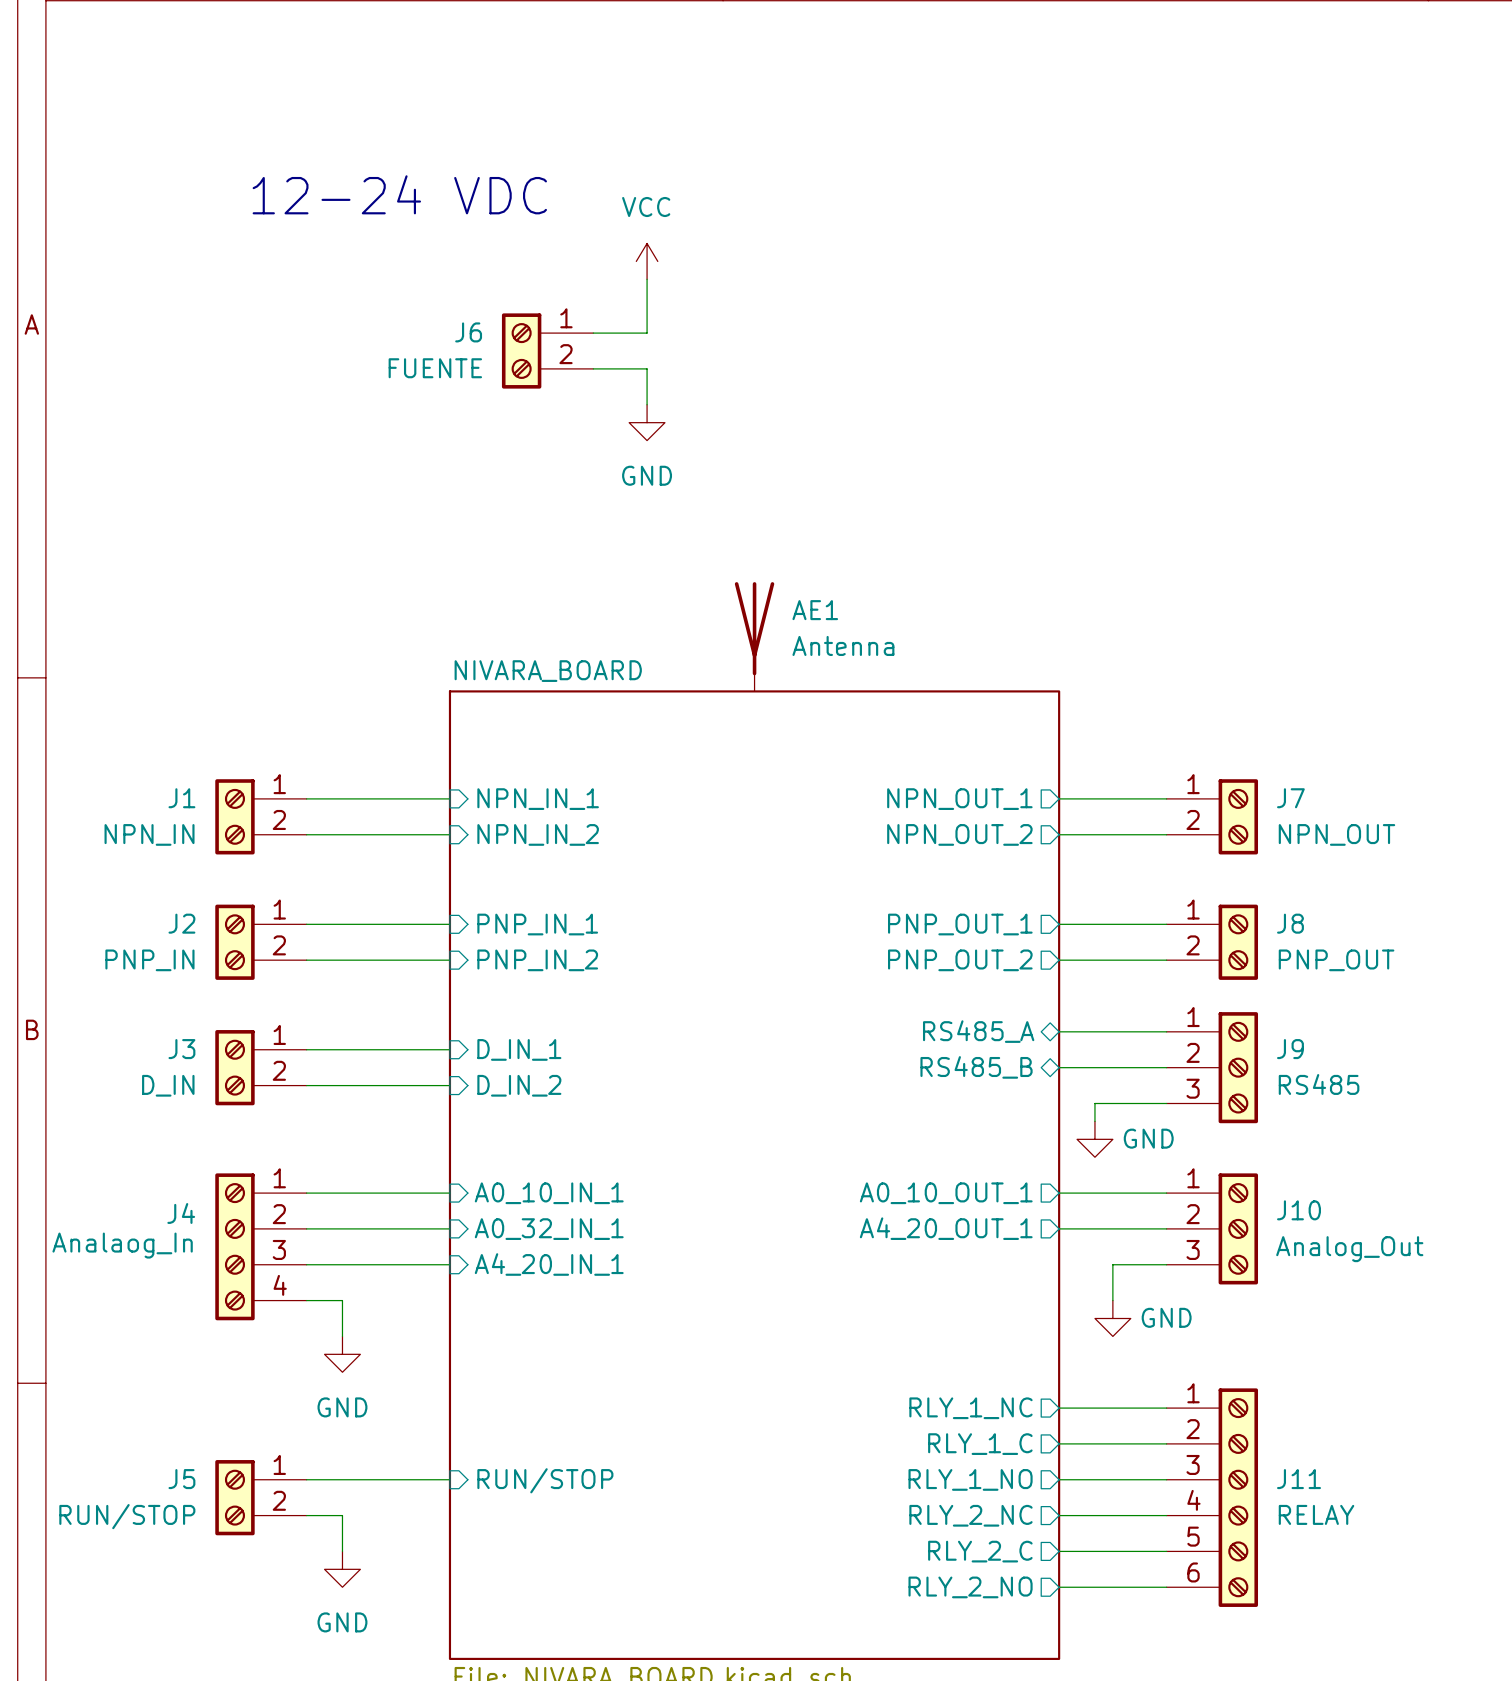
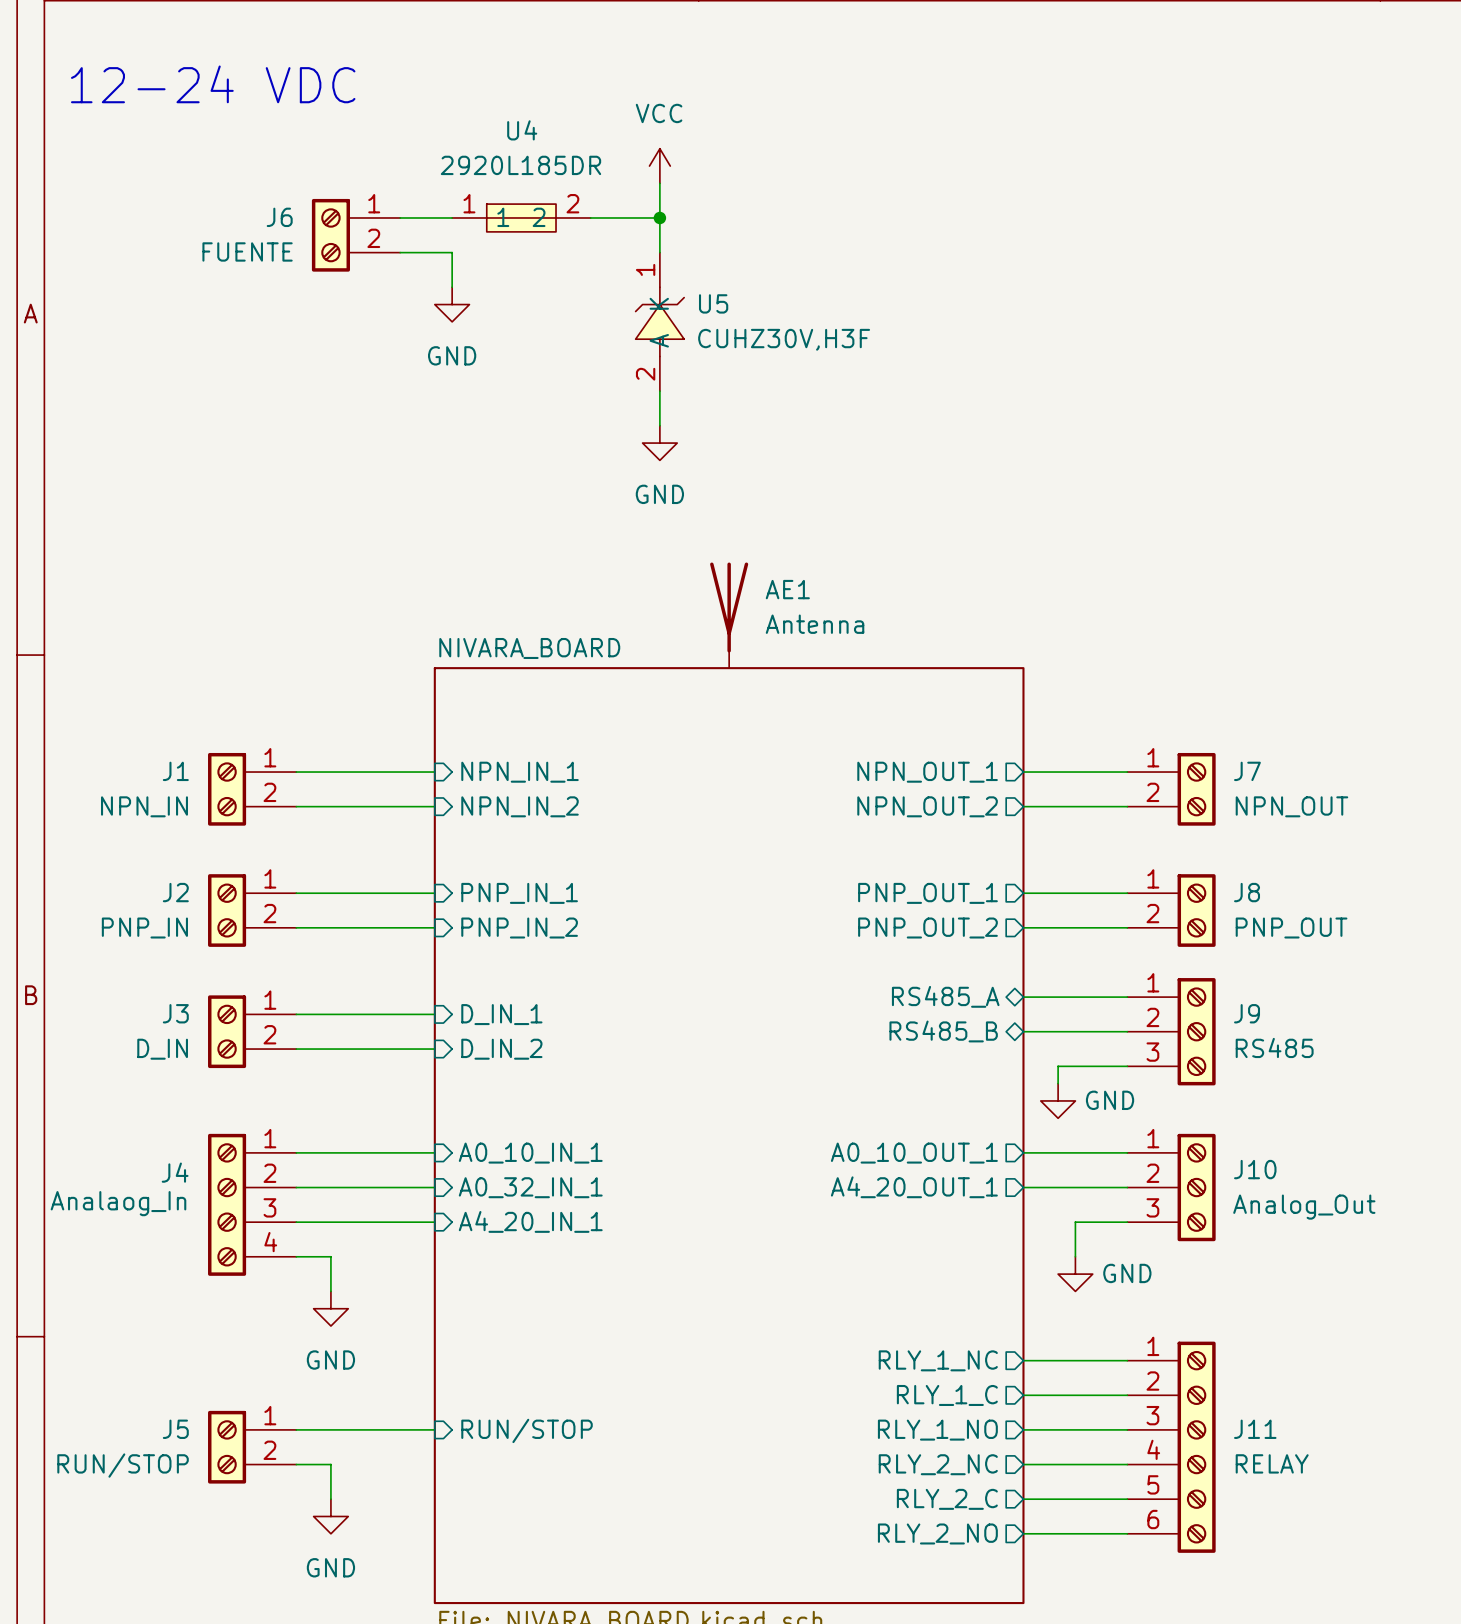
wire: none -> (659, 183) (659, 252)
text position: 12-24 VDC (399, 194) -> 12-24 VDC (213, 84)
wire: none -> (400, 217) (452, 217)
U4: none -> 2920L185DR (521, 217)
wire: none -> (590, 217) (659, 217)
junction: none -> (659, 217)
power symbol position: VCC (647, 261) -> VCC (659, 166)
wire: (647, 279) (647, 333) (593, 333) -> none
power symbol: none -> GND (452, 304)
U5: none -> CUHZ30V,H3F (659, 321)
J6 position: (547, 351) -> (356, 235)
wire: (593, 368) (647, 368) (647, 404) -> (400, 252) (452, 252) (452, 287)
wire: none -> (659, 391) (659, 425)
power symbol position: GND (647, 422) -> GND (659, 443)

